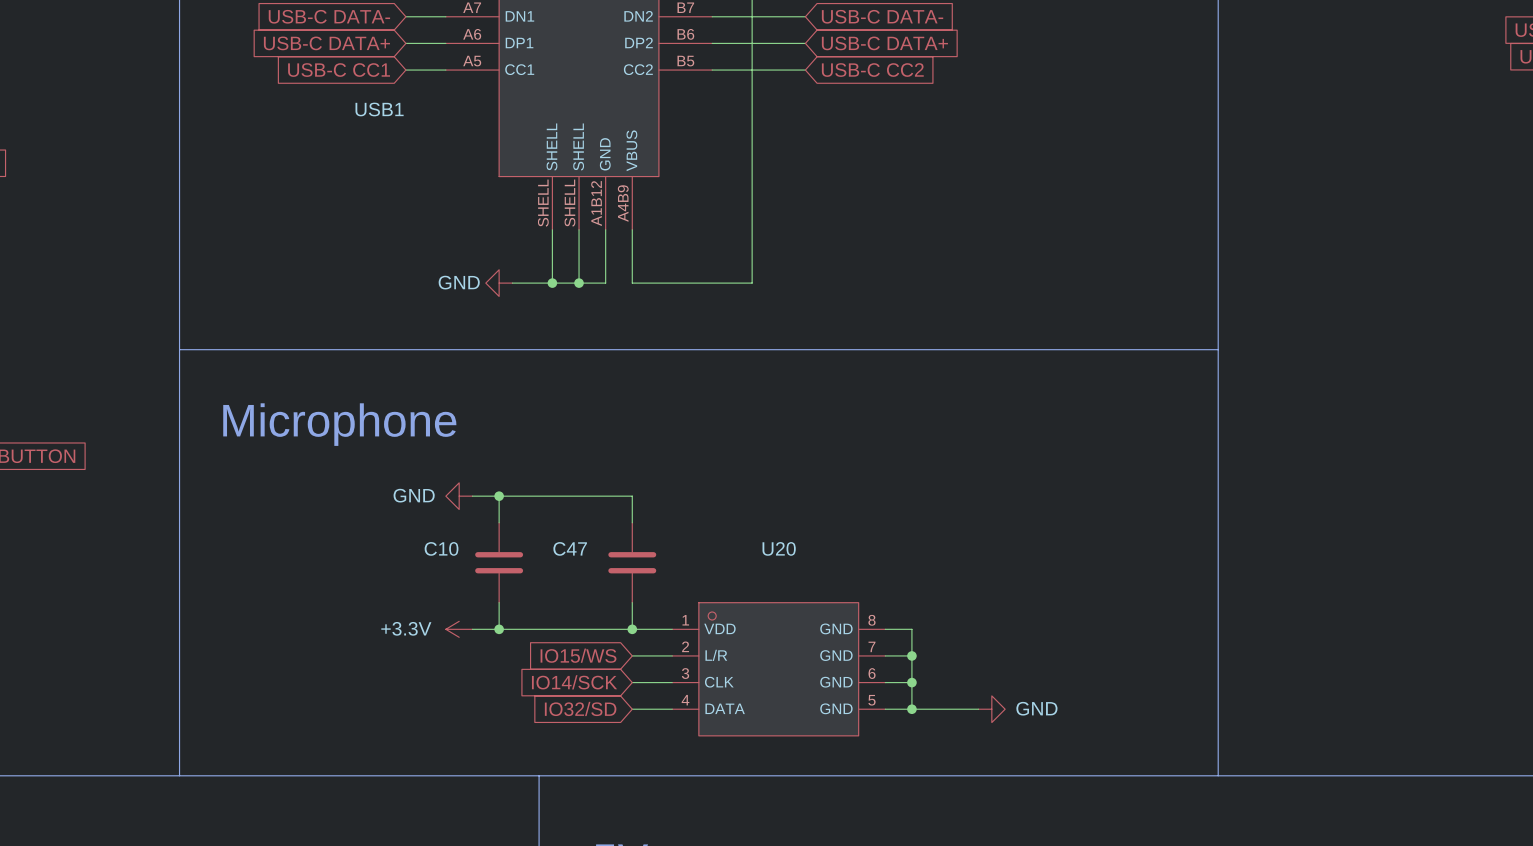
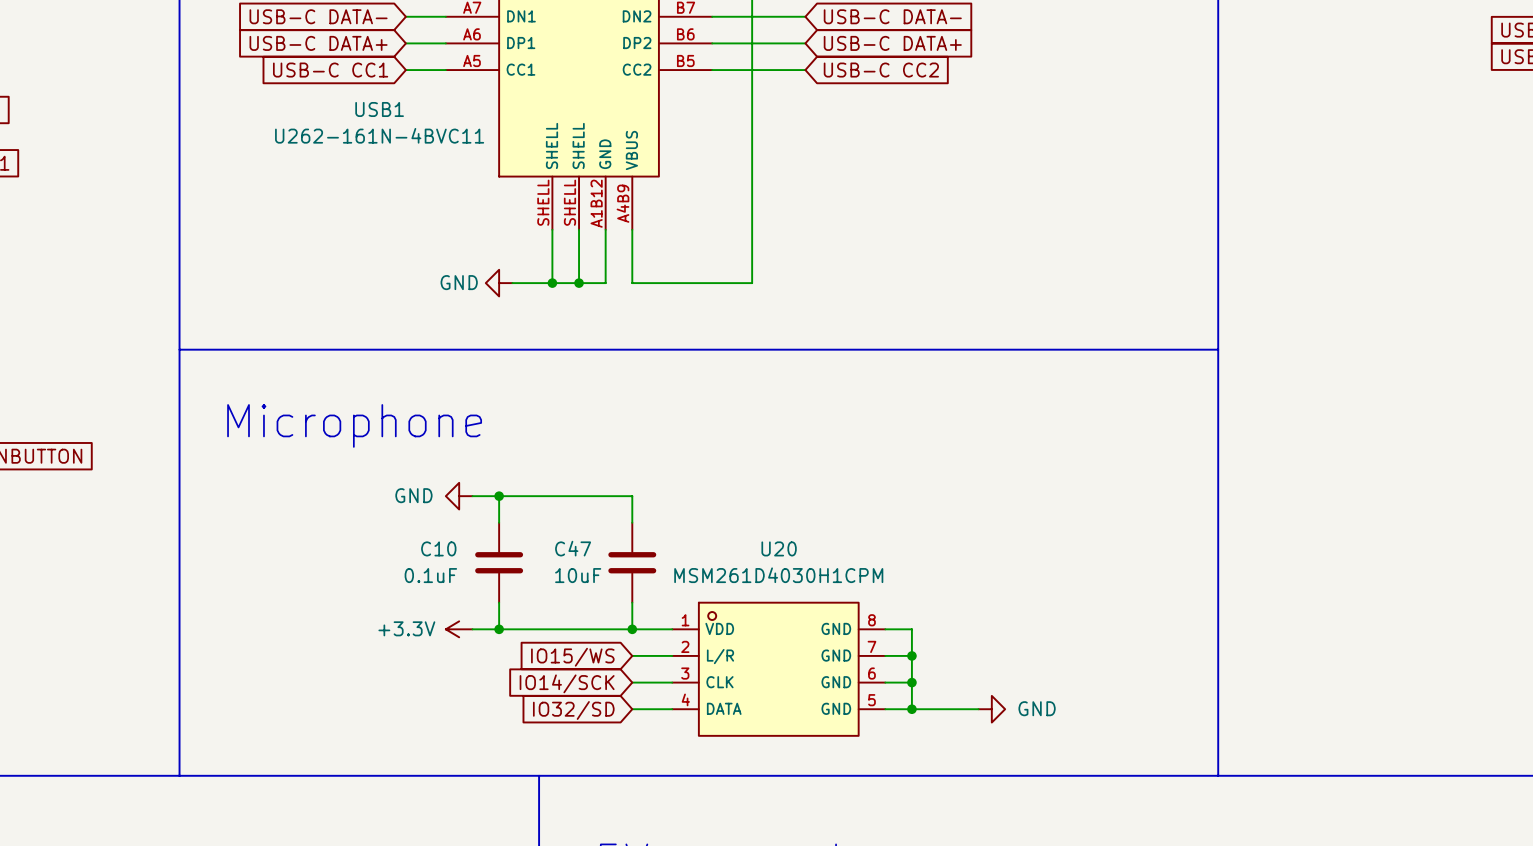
USB1 value: none -> U262-161N-4BVC11 (379, 135)
C10 value: none -> 0.1uF (430, 575)
C47 value: none -> 10uF (578, 575)
U20 value: none -> MSM261D4030H1CPM (778, 575)

